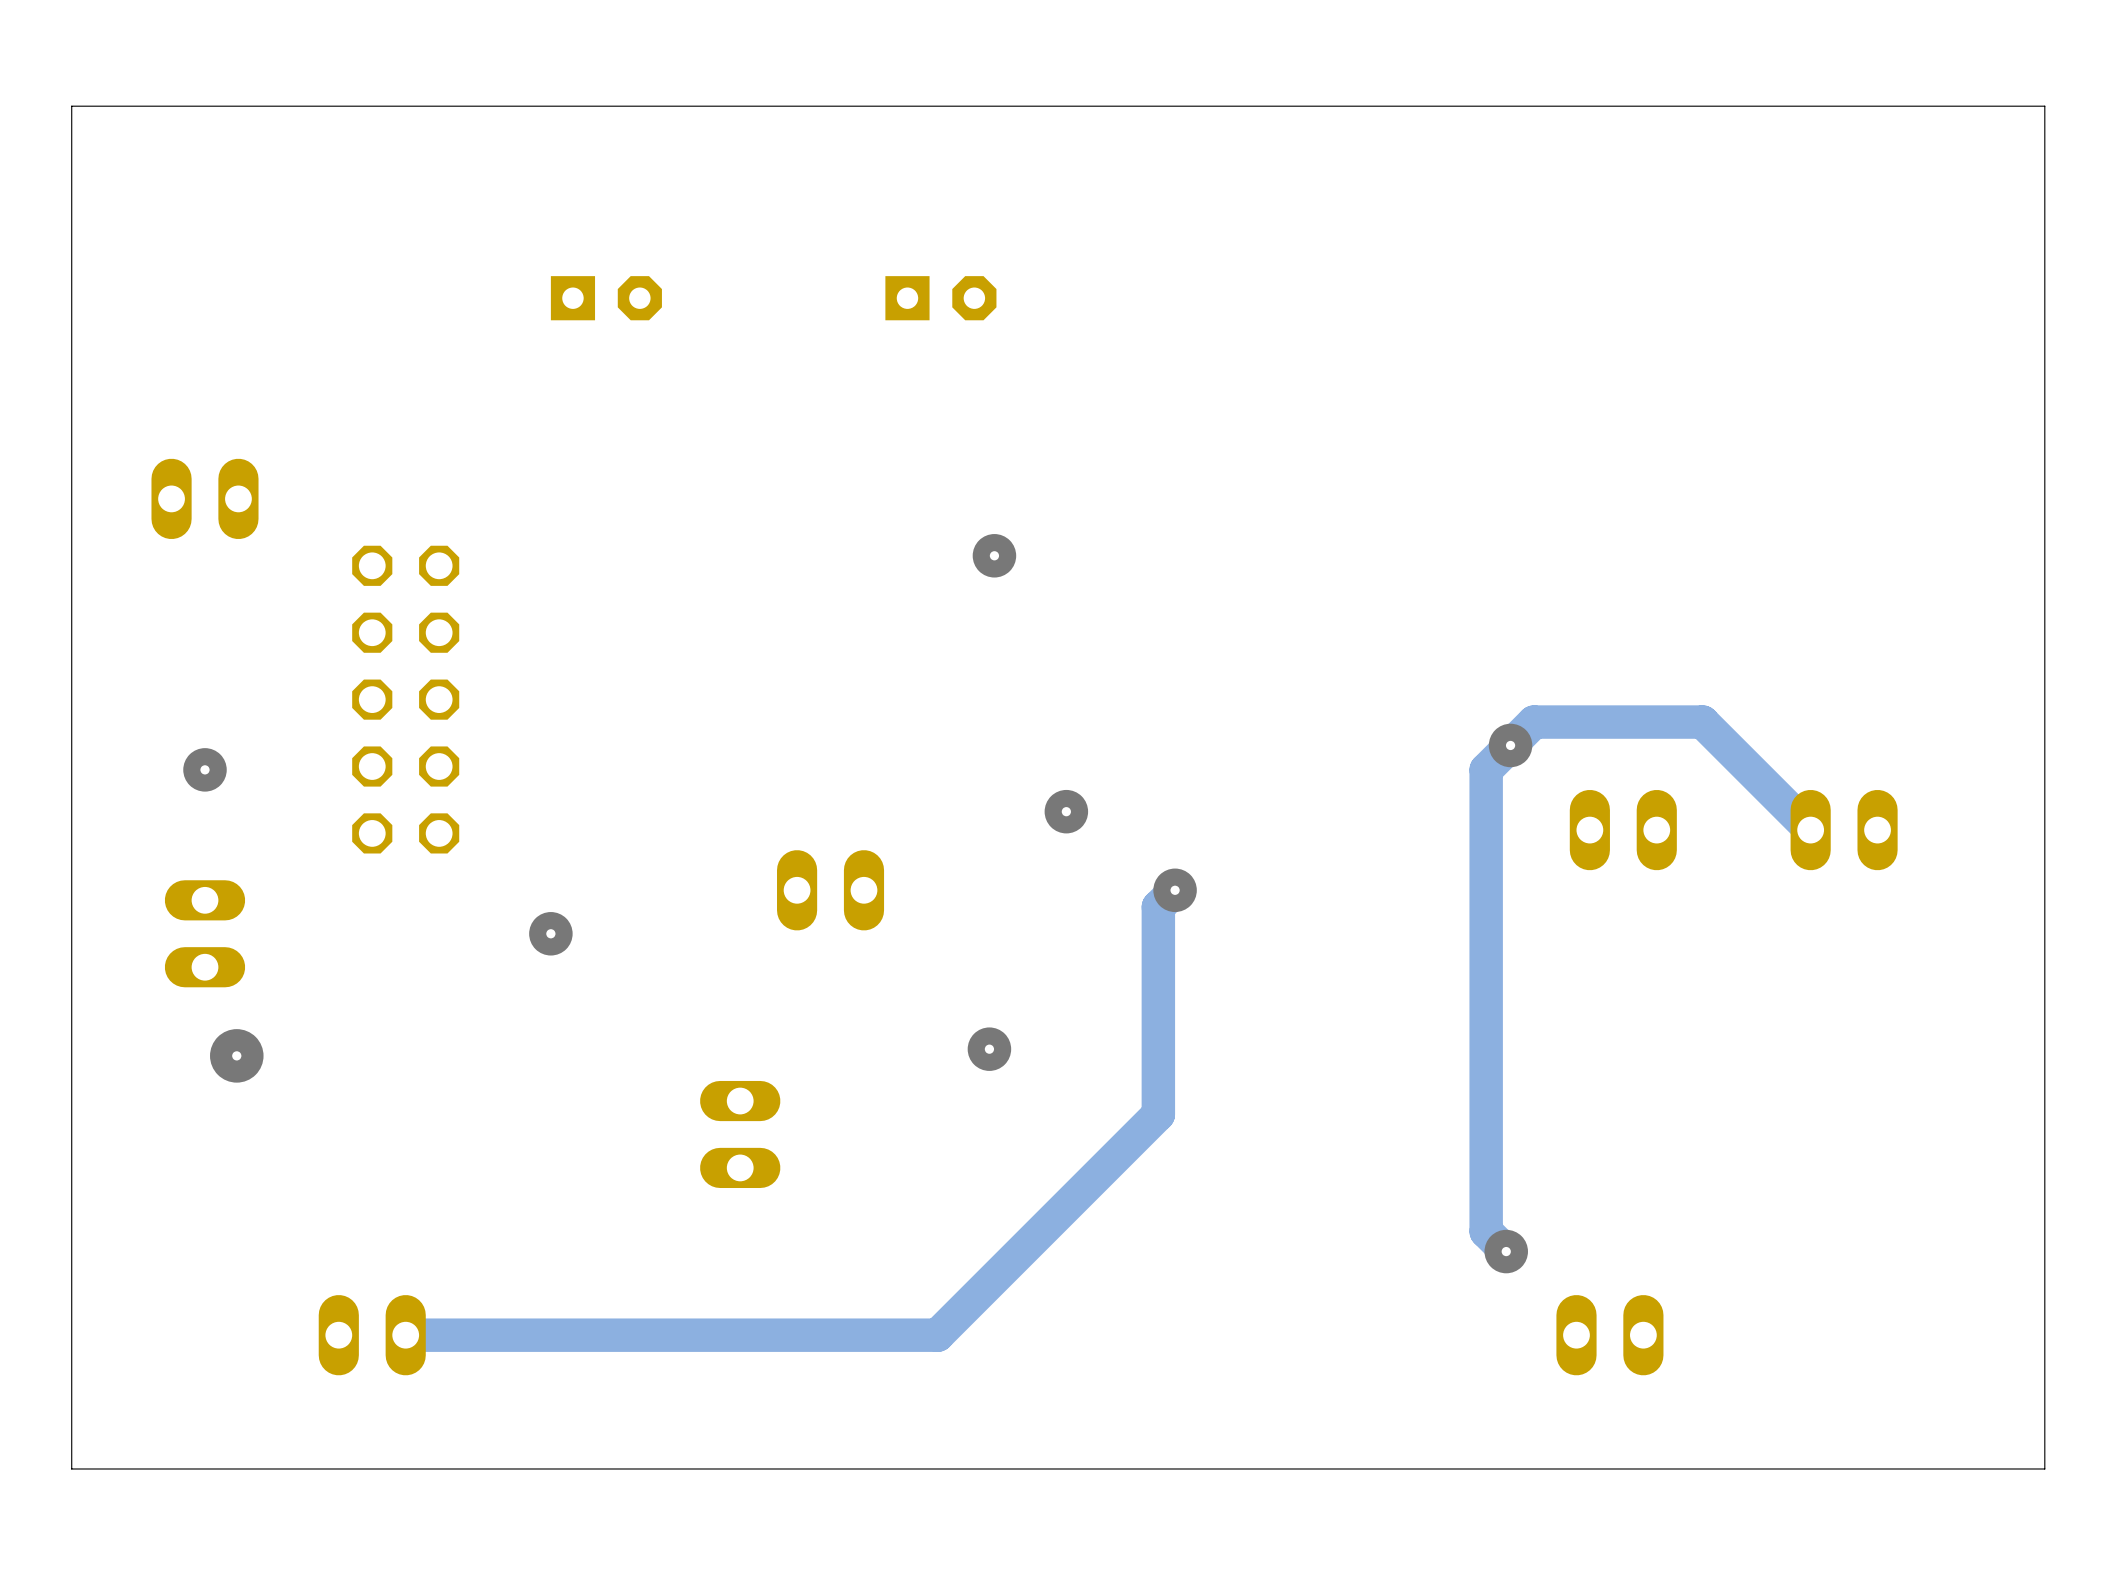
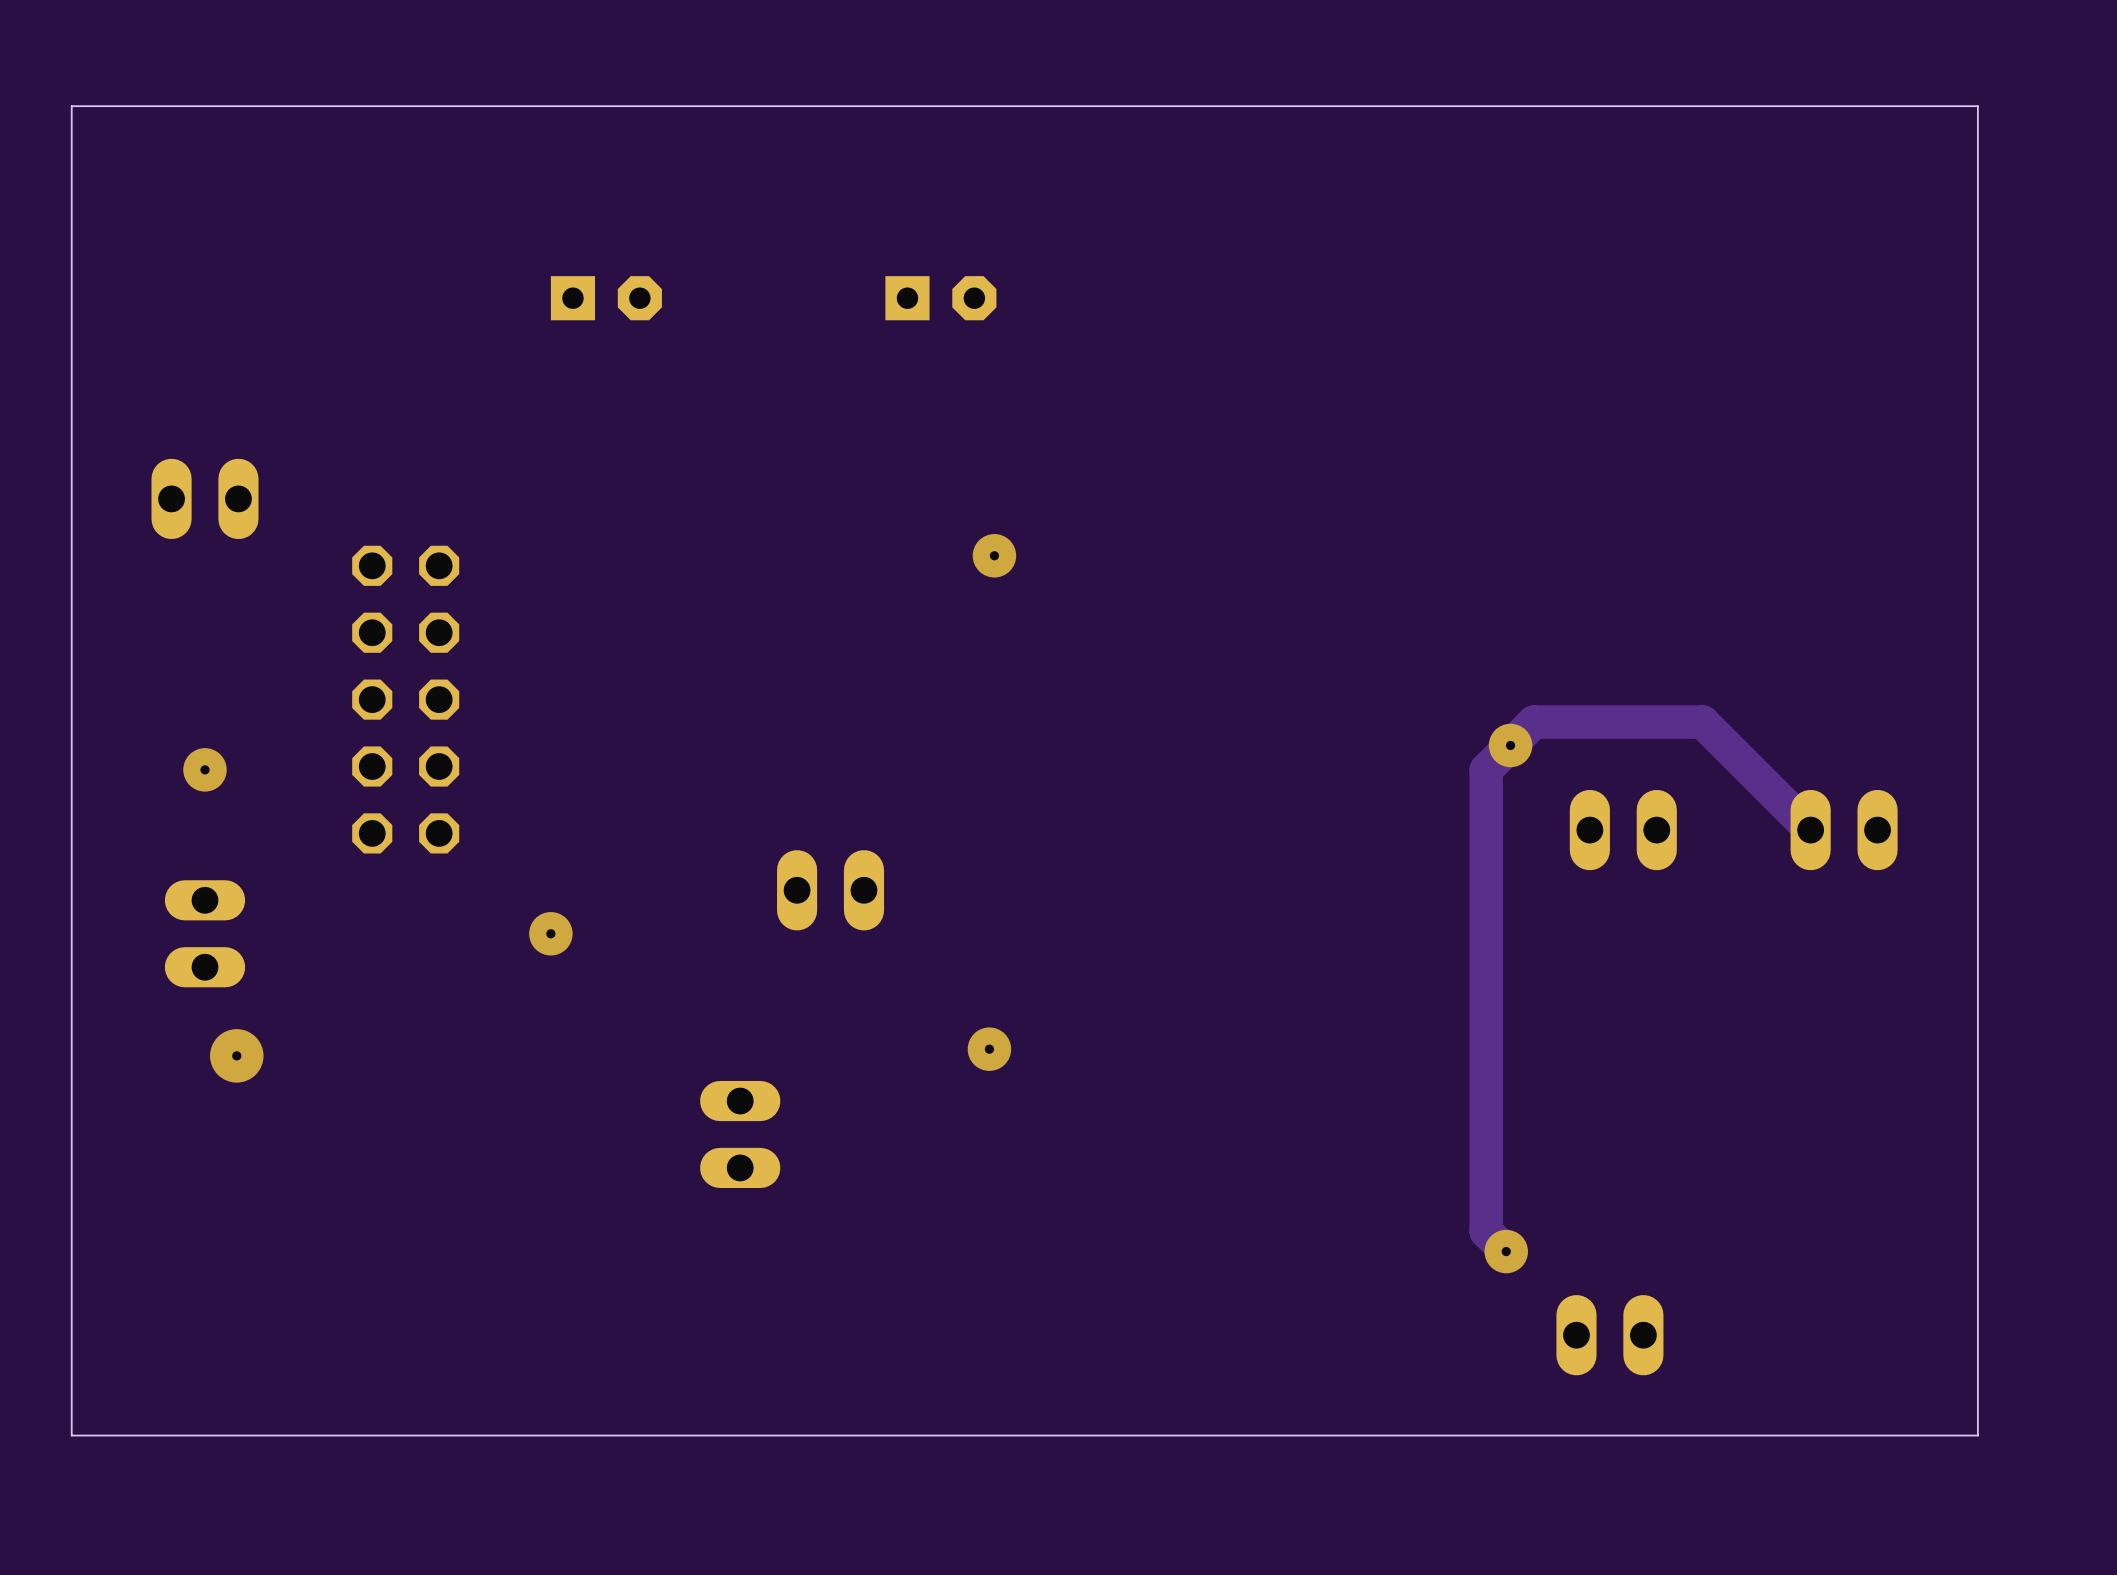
board edge: (1977, 106) (2044, 106) (2044, 1468) (71, 1468) (71, 1435) -> (1977, 106) (1977, 1435) (71, 1435)
via: (1066, 811) -> none
track: (1175, 890) (1158, 907) (1158, 1114) (937, 1335) (405, 1335) -> none
via: (1175, 890) -> none
part: (372, 1335) -> none

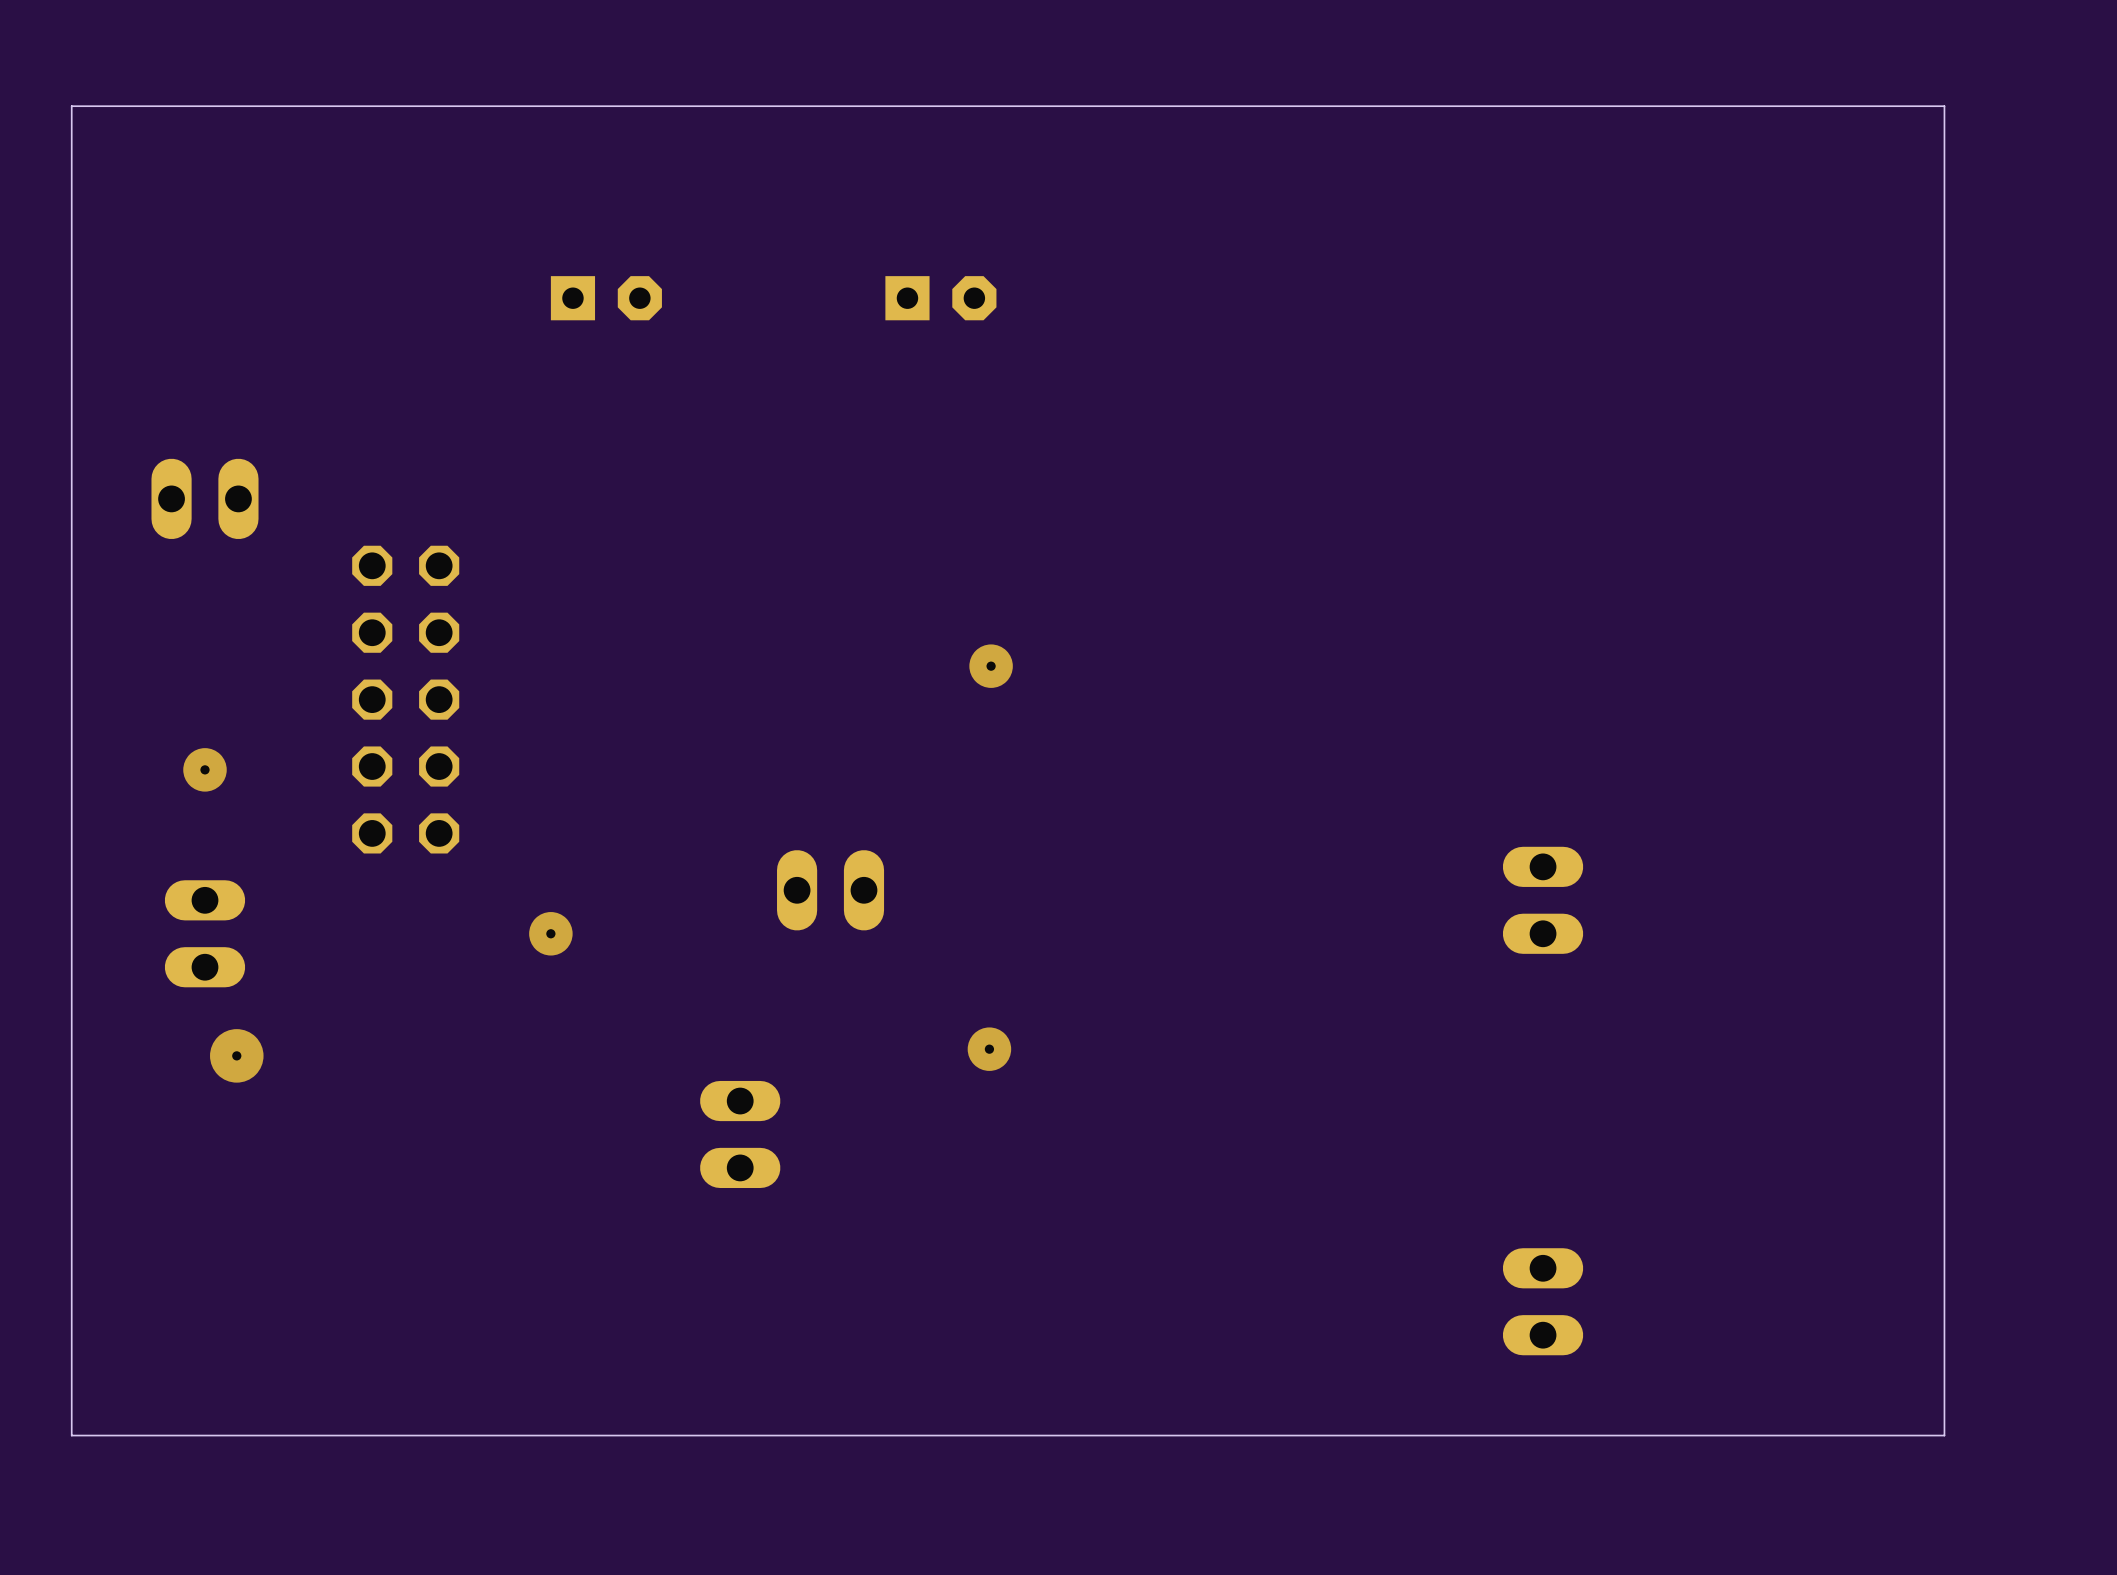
board edge: (1944, 106) (1977, 106) (1977, 1435) (1944, 1435) -> (1944, 106) (1944, 1435)
via position: (994, 555) -> (991, 666)
via: (1510, 745) -> none
part rotation: 0° (1623, 830) -> 90° clockwise (1543, 900)
part position: (1623, 830) -> (1543, 900)
track: (1810, 830) (1702, 722) (1533, 722) (1486, 769) (1486, 1231) (1506, 1251) -> none
part: (1844, 830) -> none
via: (1506, 1251) -> none
part rotation: 0° (1609, 1335) -> 90° clockwise (1543, 1301)
part position: (1609, 1335) -> (1543, 1301)

